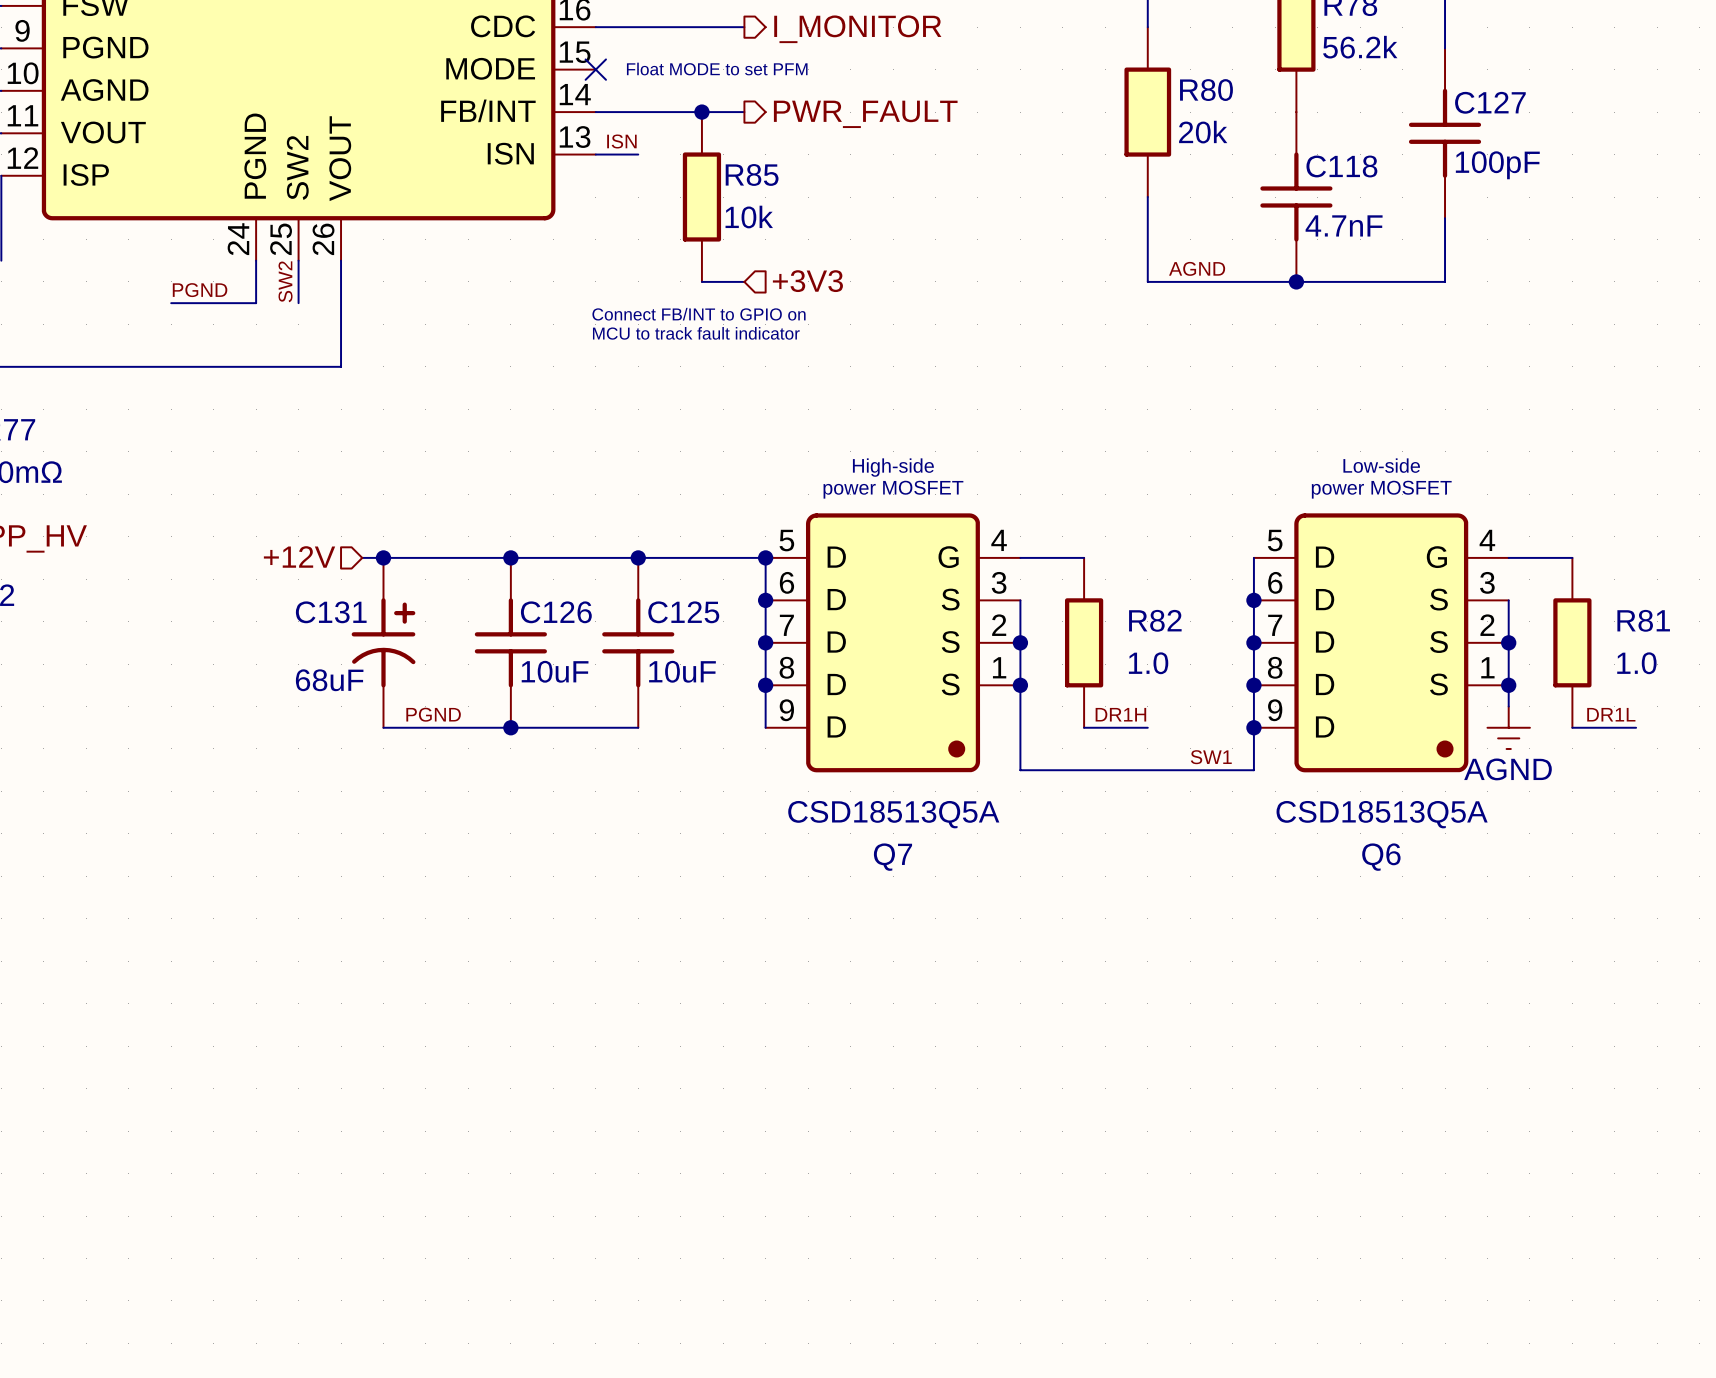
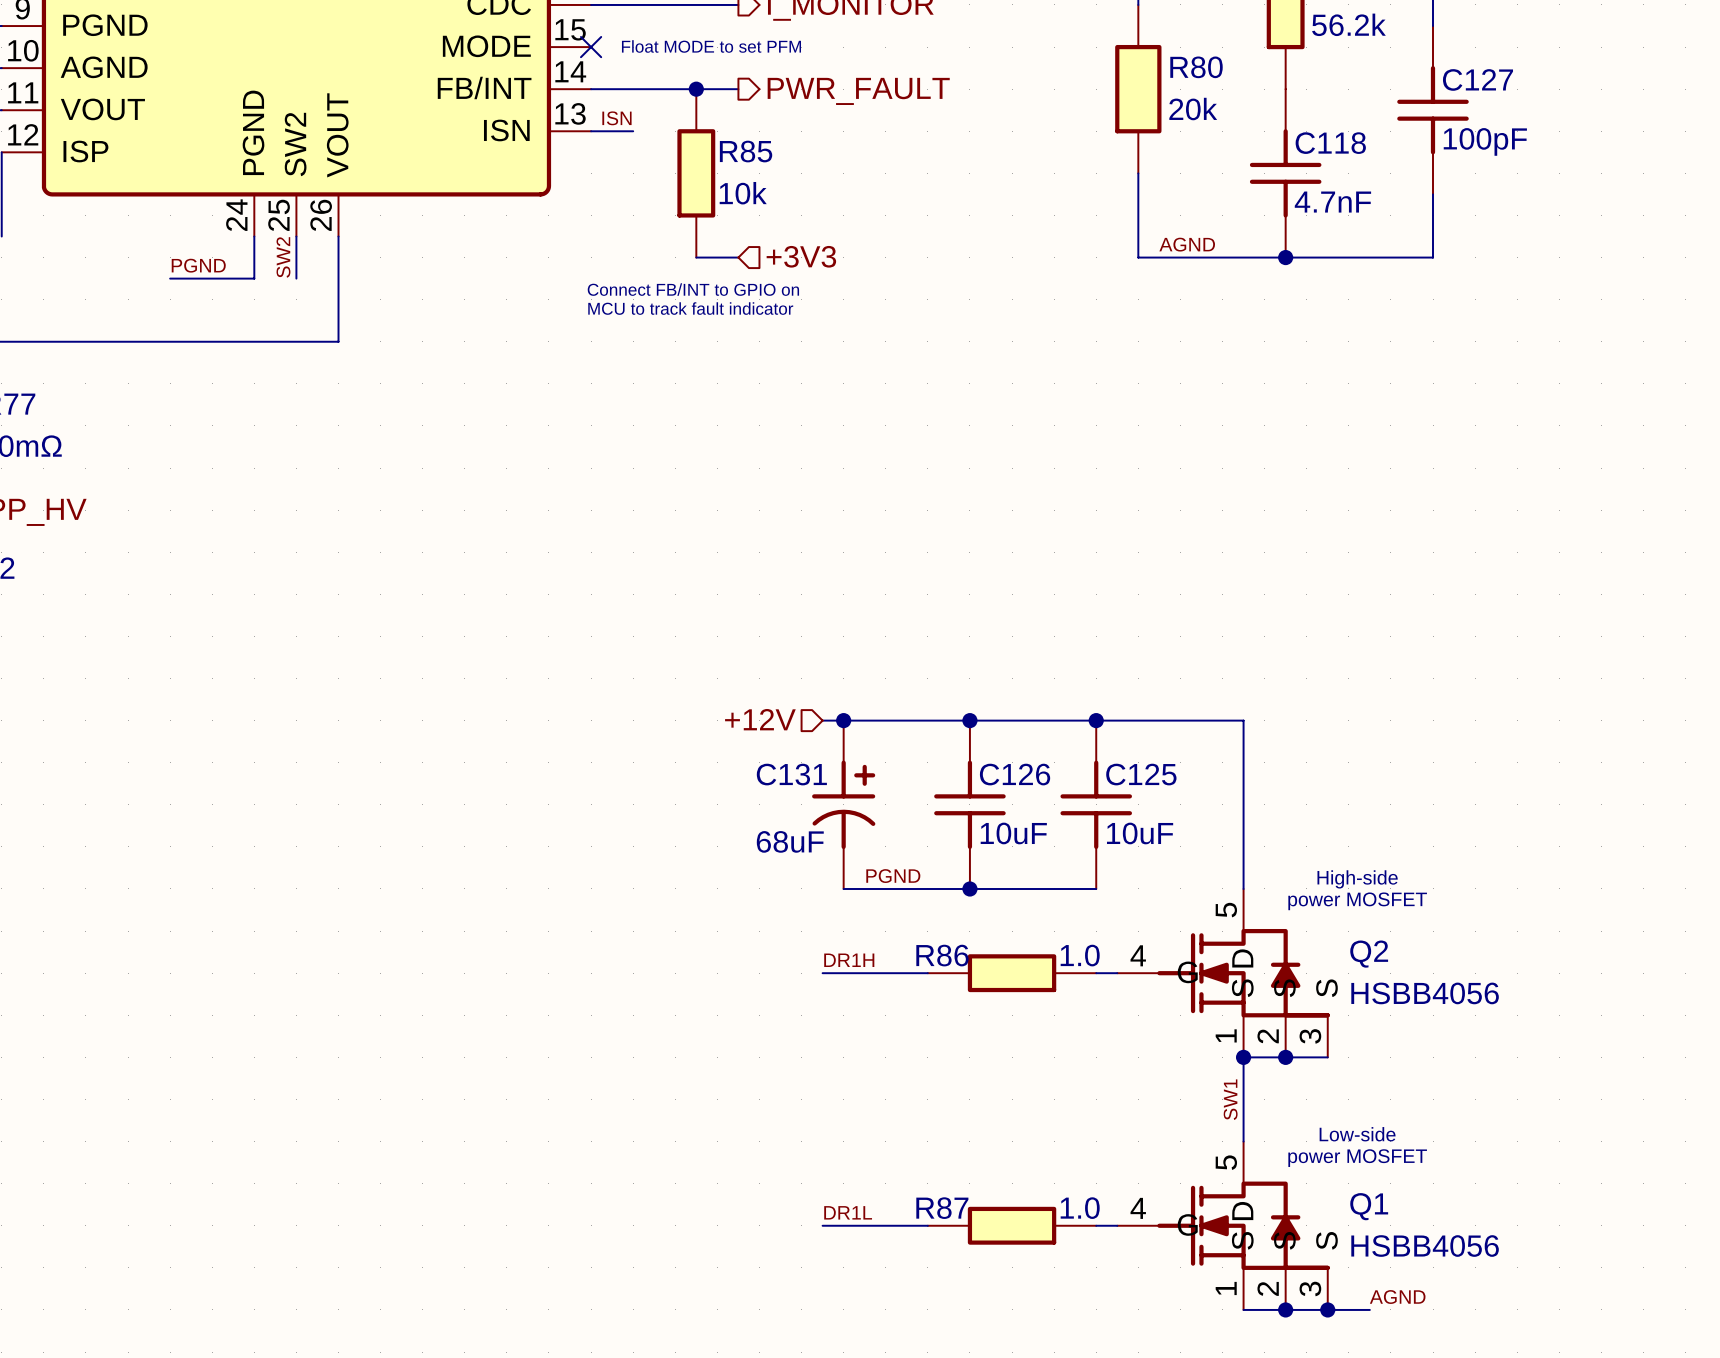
text: Low-side (1381, 465) -> none
text: High-side (893, 467) -> none
text: power MOSFET (893, 489) -> none
text: power MOSFET (1381, 489) -> none
hierarchical label: +12V (299, 556) -> none
wire: (362, 557) (765, 557) (765, 727) -> none
junction: (383, 557) -> none
junction: (510, 557) -> none
junction: (638, 557) -> none
junction: (765, 557) -> none
wire: (1020, 557) (1084, 557) -> none
wire: (1253, 557) (1253, 748) -> (822, 720) (1243, 720)
wire: (1508, 557) (1572, 557) -> none
junction: (765, 600) -> none
wire: (1020, 600) (1020, 770) (1253, 770) -> (1243, 888) (1243, 741)
junction: (1253, 600) -> none
wire: (1508, 600) (1508, 706) -> none
C131 position: (383, 642) -> (843, 804)
C126 position: (510, 642) -> (969, 804)
C125 position: (638, 642) -> (1096, 804)
junction: (765, 642) -> none
Q7: CSD18513Q5A (893, 642) -> none
junction: (1020, 642) -> none
R82: 1.0 (1084, 642) -> none
junction: (1253, 642) -> none
Q6: CSD18513Q5A (1381, 642) -> none
junction: (1508, 642) -> none
R81: 1.0 (1572, 642) -> none
junction: (765, 685) -> none
junction: (1020, 685) -> none
junction: (1253, 685) -> none
junction: (1508, 685) -> none
label: PGND (433, 714) -> none
label: DR1H (1120, 714) -> none
label: DR1L (1611, 714) -> none
wire: (383, 727) (638, 727) -> none
junction: (510, 727) -> none
wire: (1084, 727) (1147, 727) -> none
junction: (1253, 727) -> none
power symbol: AGND (1508, 727) -> none
wire: (1572, 727) (1636, 727) -> none
hierarchical label: none -> +12V (760, 719)
junction: none -> (843, 720)
junction: none -> (969, 720)
junction: none -> (1096, 720)
label rotation: 0° (1211, 757) -> 90° counterclockwise (1230, 1099)
label position: SW1 (1211, 757) -> SW1 (1230, 1099)
label: none -> PGND (893, 876)
text: none -> High-side (1357, 879)
wire: none -> (843, 888) (1096, 888)
junction: none -> (969, 888)
text: none -> power MOSFET (1357, 901)
label: none -> DR1H (849, 960)
wire: none -> (822, 973) (927, 973)
R86: none -> 1.0 (1012, 973)
wire: none -> (1096, 973) (1117, 973)
Q2: none -> HSBB4056 (1223, 973)
junction: none -> (1243, 1057)
junction: none -> (1285, 1057)
wire: none -> (1327, 1057) (1243, 1057) (1243, 1141)
text: none -> Low-side (1357, 1134)
text: none -> power MOSFET (1357, 1158)
label: none -> DR1L (848, 1212)
wire: none -> (822, 1225) (927, 1225)
R87: none -> 1.0 (1012, 1225)
wire: none -> (1096, 1225) (1117, 1225)
Q1: none -> HSBB4056 (1223, 1225)
label: none -> AGND (1397, 1297)
wire: none -> (1243, 1309) (1369, 1309)
junction: none -> (1285, 1309)
junction: none -> (1327, 1309)

